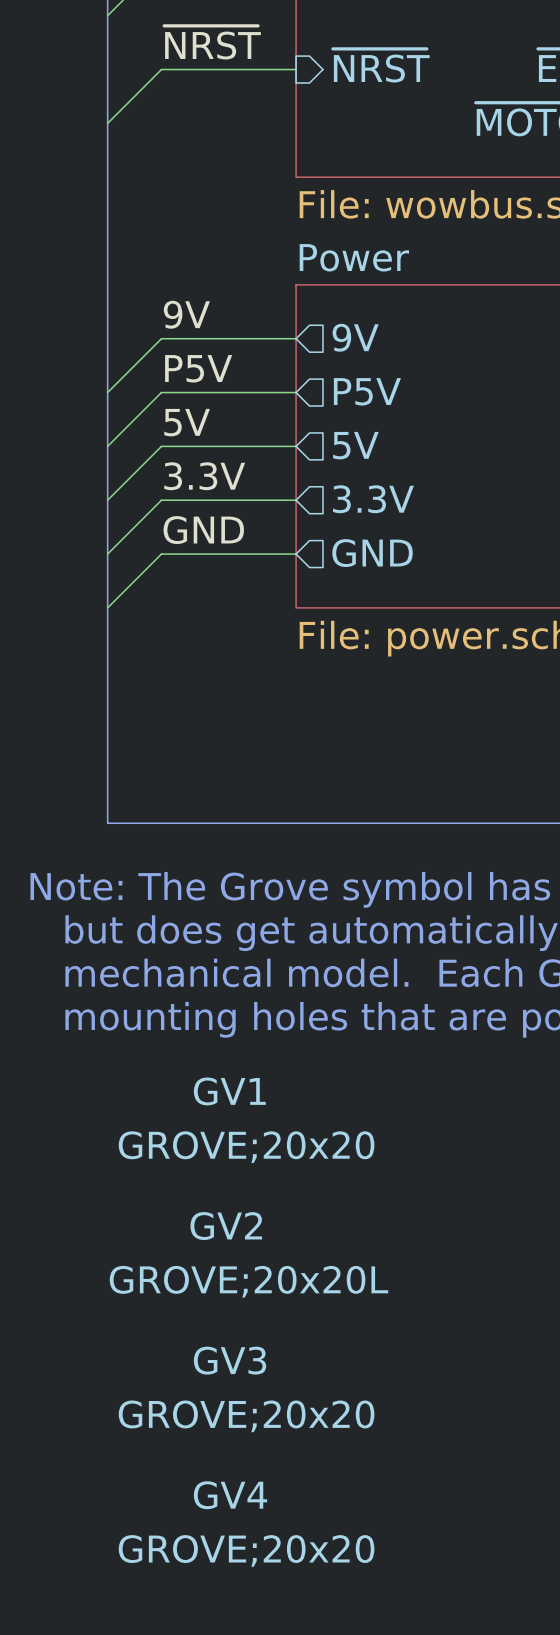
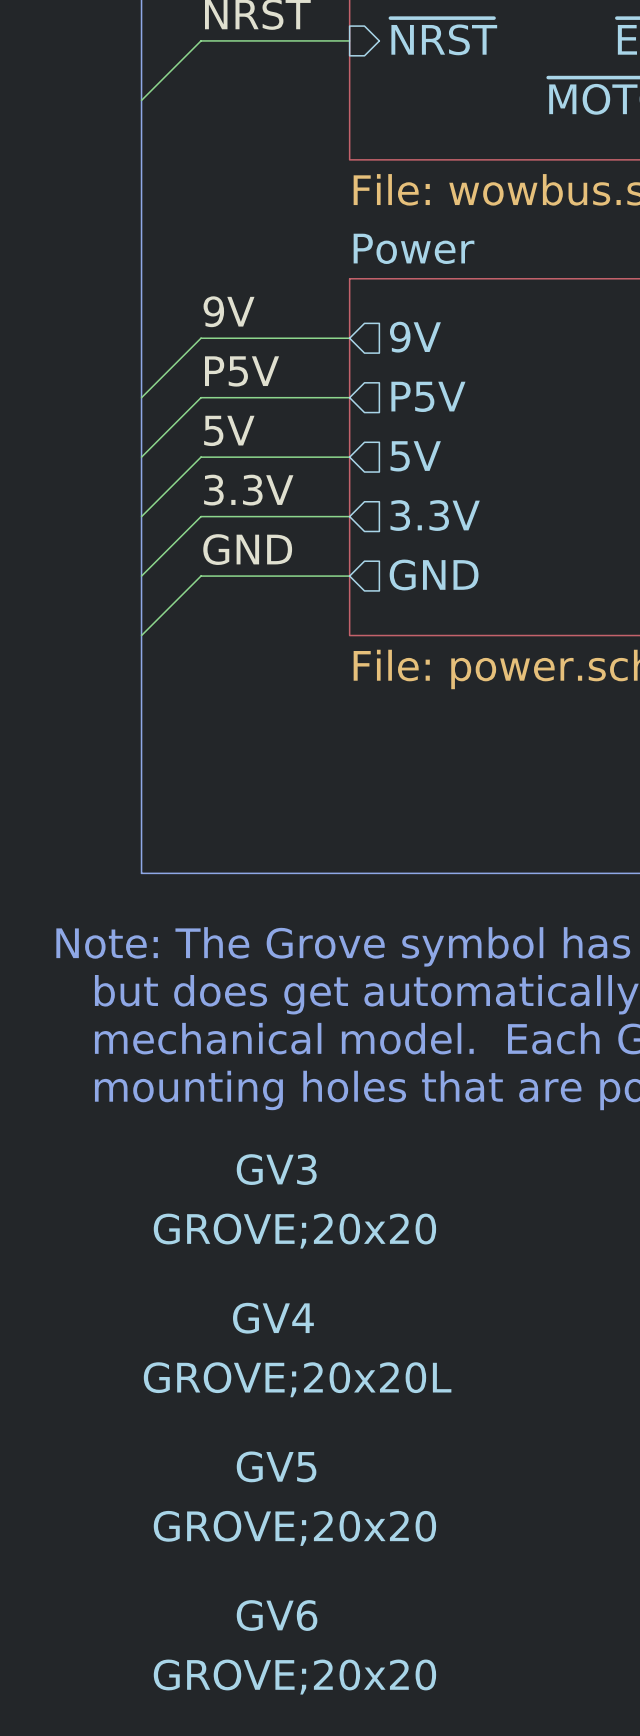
GV1 name: GV1 (229, 1091) -> GV3 (276, 1169)
GV2 name: GV2 (226, 1226) -> GV4 (273, 1318)
GV3 name: GV3 (230, 1360) -> GV5 (276, 1466)
GV4 name: GV4 (230, 1495) -> GV6 (277, 1615)

